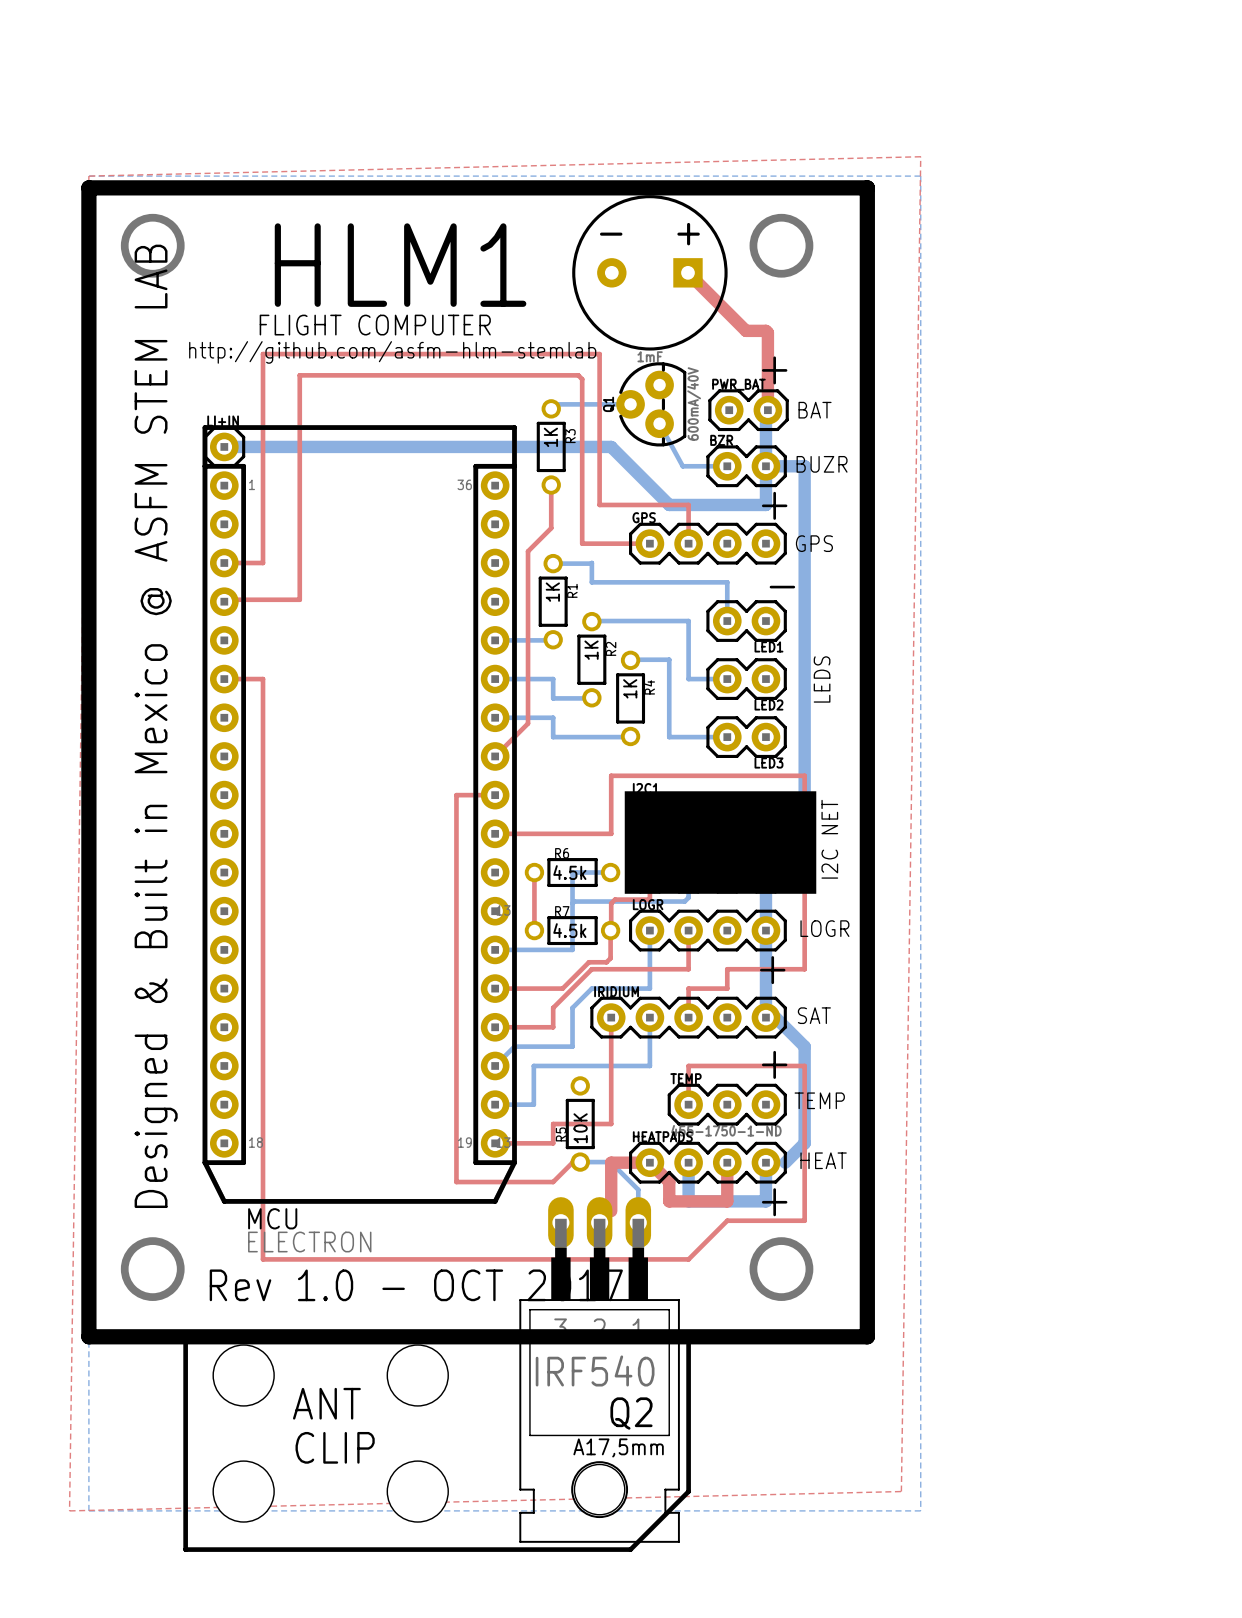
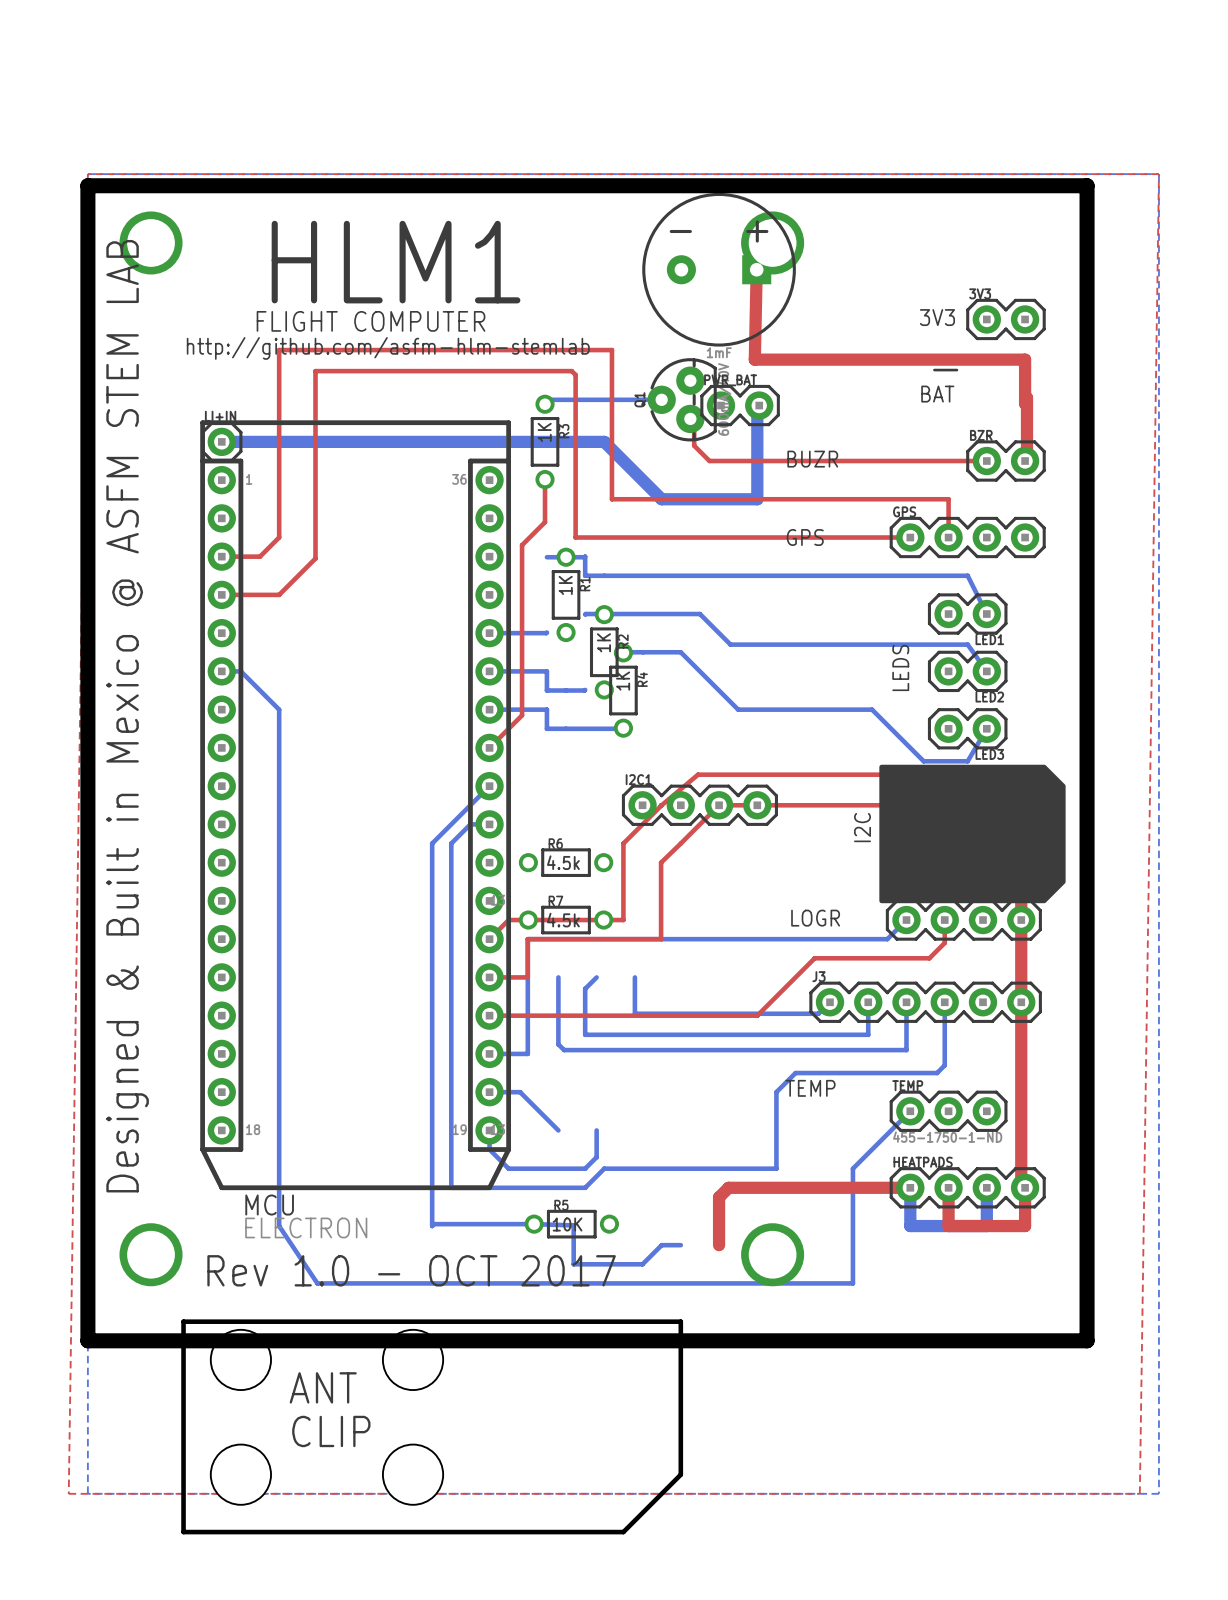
top zone outline: (88, 176) (920, 156) (901, 1491) (69, 1510) -> (87, 174) (1158, 174) (1139, 1493) (68, 1493)
bottom zone outline: (920, 176) (920, 1510) -> (910, 174) (1158, 174) (1158, 1493) (910, 1493)
board edge: (867, 187) (867, 1336) (88, 1336) -> (857, 185) (1087, 185) (1087, 1340) (87, 1340) (87, 1321)
part position: (649, 272) -> (719, 269)
top track: (687, 272) (746, 330) (765, 330) (767, 332) (767, 410) -> none
top track: none -> (756, 269) (754, 359) (1025, 359) (1025, 403) (1026, 397) (1026, 459) (1025, 461)
text: none -> 3V3 (937, 317)
3V3: none -> (1005, 319)
top track: (282, 354) (263, 354) (263, 563) -> (279, 350) (279, 537) (260, 556)
top track: (599, 354) (599, 504) (618, 504) -> (592, 350) (611, 350) (611, 499)
text: + (774, 370) -> none
top track: (319, 375) (299, 375) (299, 599) (226, 599) -> (315, 371) (315, 558) (279, 594) (221, 594)
bottom track: none -> (623, 399) (661, 399)
Q1 position: (651, 404) -> (682, 399)
text position: BAT (815, 410) -> BAT (937, 394)
bottom track: (659, 423) (682, 466) (727, 466) -> none
top track: none -> (690, 418) (694, 422) (694, 445) (709, 461) (986, 461)
BZR position: (746, 466) -> (1005, 461)
bottom track: (765, 466) (804, 466) (804, 814) (765, 814) (765, 1017) (775, 1017) (804, 1046) (804, 1143) (785, 1162) (765, 1162) (765, 1201) (688, 1201) (688, 1162) -> none
top track: (688, 504) (688, 543) -> (680, 499) (948, 499) (948, 537)
text: + (774, 505) -> none
top track: none -> (642, 537) (910, 537)
GPS position: (707, 543) -> (967, 537)
bottom track: (727, 582) (727, 621) -> (719, 575) (967, 575) (986, 614)
text position: - (782, 587) -> - (945, 370)
R1 position: (553, 601) -> (566, 594)
bottom track: (688, 621) (688, 679) (727, 679) -> (680, 614) (699, 614) (730, 644) (967, 644) (986, 671)
LED1 position: (746, 621) -> (967, 614)
R2 position: (591, 659) -> (604, 652)
bottom track: (669, 659) (669, 737) (727, 737) -> (661, 652) (680, 652) (738, 709) (872, 709) (923, 761) (967, 761) (986, 728)
top track: (224, 679) (263, 679) (263, 1259) (688, 1259) (727, 1220) (804, 1220) (804, 1065) (688, 1065) (688, 1104) -> none
bottom track: none -> (221, 671) (240, 671) (279, 709) (279, 1226) (317, 1283) (852, 1283) (852, 1168) (910, 1111)
LED2 position: (746, 679) -> (967, 671)
text position: LEDS (822, 679) -> LEDS (900, 667)
text position: Designed & Built in Mexico @ ASFM STEM LAB (156, 726) -> Designed & Built in Mexico @ ASFM STEM LAB (127, 716)
LED3 position: (746, 737) -> (967, 728)
drawing: none -> [879, 764, 1066, 904]
drawing: [624, 791, 817, 894] -> none
top track: (495, 795) (456, 795) (456, 1182) (553, 1182) (572, 1162) (580, 1162) -> none
bottom track: none -> (489, 786) (432, 843) (432, 1226) (434, 1224) (573, 1225) (573, 1264) (642, 1264) (661, 1245) (680, 1245)
top track: (649, 814) (649, 899) (615, 899) (611, 903) (610, 958) (606, 962) (588, 962) (562, 988) (533, 988) -> (906, 866) (906, 811) (900, 805) (719, 805) (661, 862) (661, 939) (527, 939) (527, 977)
bottom track: (688, 814) (688, 897) (684, 901) (574, 901) (572, 903) -> none
top track: none -> (1021, 811) (1021, 1183) (1025, 1187) (1025, 1226) (948, 1226) (948, 1187)
top track: (495, 833) (611, 833) (611, 775) (804, 775) (804, 969) (727, 969) (727, 988) (688, 988) (688, 1017) -> none
bottom track: none -> (489, 824) (470, 824) (451, 843) (451, 1187) (585, 1187) (604, 1168) (776, 1168) (776, 1092) (795, 1073) (937, 1073) (944, 1065) (944, 1002)
text: none -> I2C (862, 827)
text: I2C NET (829, 839) -> none
top track: (534, 872) (534, 930) -> none
bottom track: (610, 872) (576, 872) (574, 874) (572, 872) (572, 949) -> (906, 920) (887, 939) (566, 939)
top track: none -> (944, 866) (944, 774) (698, 774) (661, 805) (623, 843) (623, 920) (508, 920) (489, 939)
bottom track: (649, 930) (649, 988) (591, 988) (572, 1007) (572, 1046) (514, 1046) (495, 1065) -> none
top track: (688, 930) (688, 969) (591, 969) (553, 1007) (553, 1027) -> (944, 920) (944, 942) (929, 958) (814, 958) (757, 1015) (546, 1015)
LOGR position: (707, 930) -> (963, 920)
bottom track: (495, 949) (533, 949) -> (489, 1053) (527, 1053) (527, 939)
text: + (772, 970) -> none
bottom track: none -> (558, 977) (558, 1044) (564, 1050) (906, 1050) (906, 1002)
bottom track: none -> (596, 977) (585, 988) (585, 1034) (868, 1034) (868, 1002)
bottom track: none -> (634, 977) (634, 1013) (818, 1013) (829, 1002)
J3: none -> (925, 1002)
text: SAT (814, 1015) -> none
top track: (611, 1017) (611, 1124) (553, 1124) (553, 1143) (495, 1143) -> none
bottom track: (649, 1017) (649, 1065) (533, 1065) (533, 1104) (526, 1104) -> (558, 1130) (520, 1092)
IRIDIUM: (688, 1017) -> none
text: + (774, 1064) -> none
TEMP position: (727, 1104) -> (948, 1111)
R5 rotation: 0° (580, 1124) -> 90° clockwise (571, 1224)
R5 position: (580, 1124) -> (571, 1224)
bottom track: none -> (489, 1130) (489, 1149) (508, 1168) (585, 1168) (596, 1157) (596, 1130)
text: HEAT (823, 1160) -> none
bottom track: (573, 1162) (610, 1162) (638, 1189) (638, 1222) -> none
HEATPADS position: (707, 1162) -> (967, 1187)
top track: (727, 1162) (727, 1201) (669, 1201) (669, 1182) (649, 1162) (611, 1162) (611, 1211) (599, 1222) -> none
top track: none -> (910, 1187) (728, 1187) (719, 1197) (719, 1245)
bottom track: none -> (910, 1187) (910, 1226) (986, 1226) (986, 1187)
text: + (774, 1202) -> none
Q2: IRF540 (599, 1369) -> none

